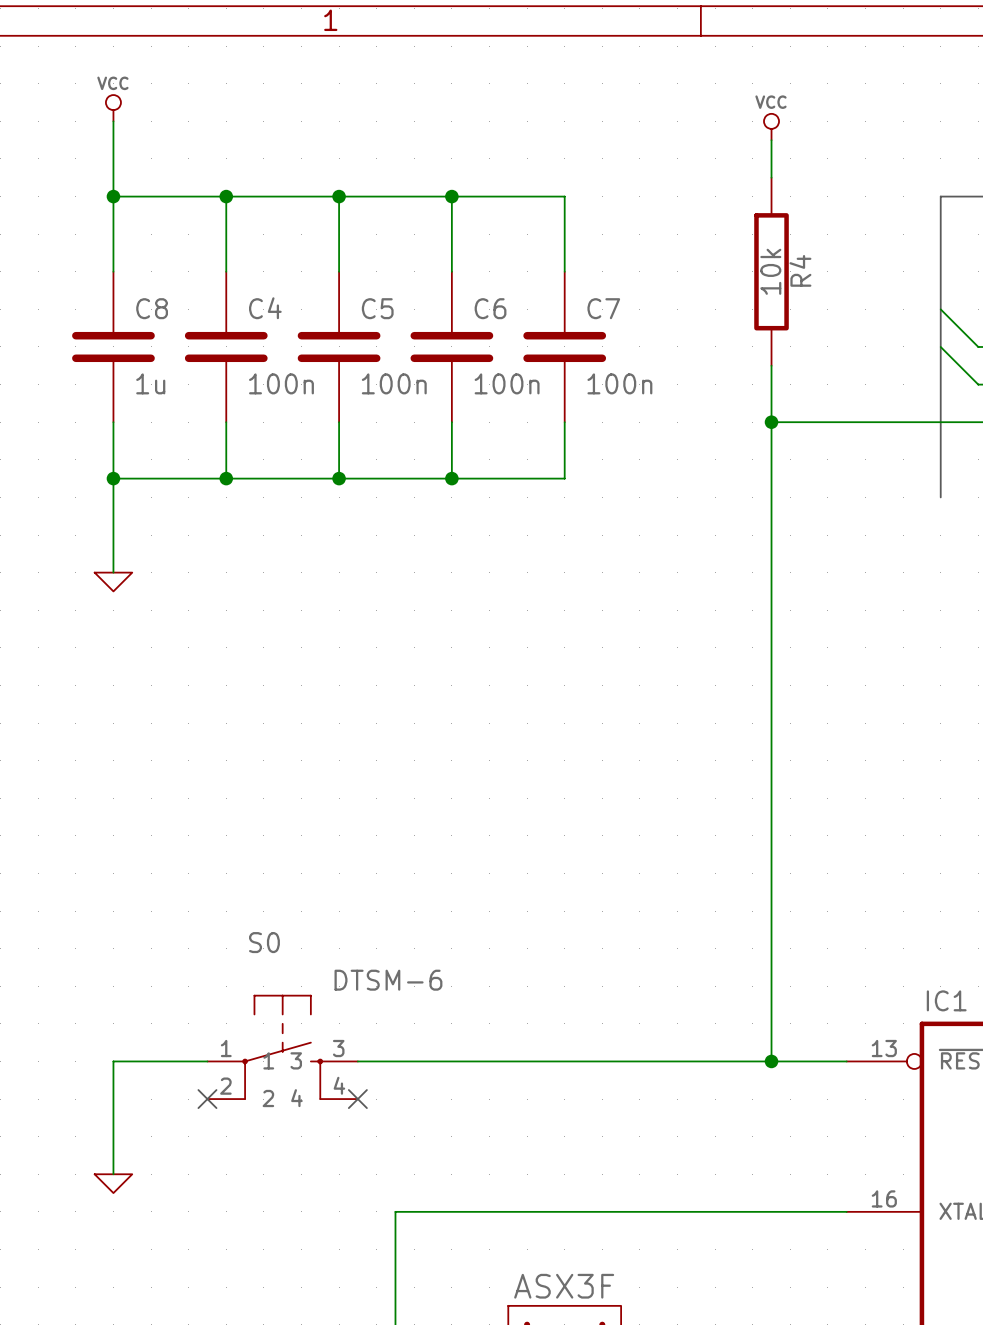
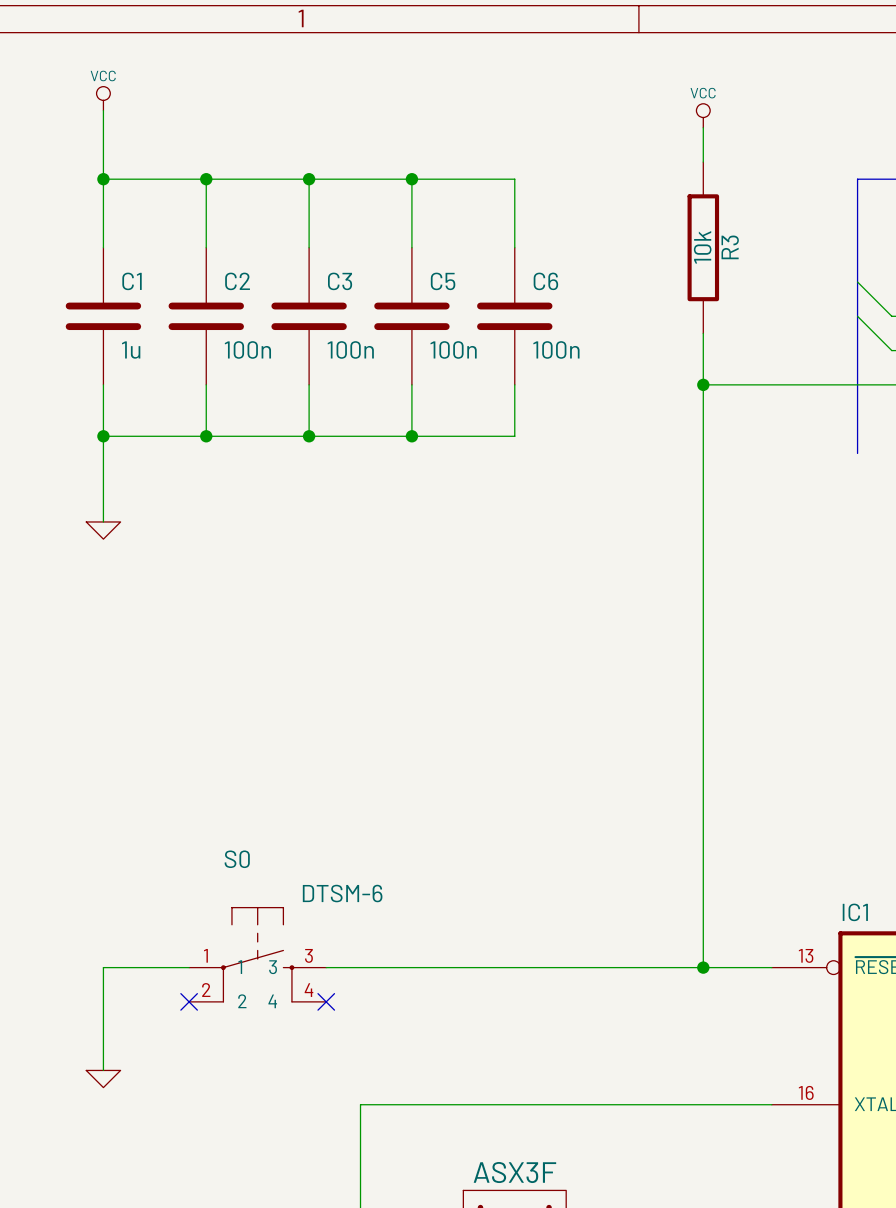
R4 name: R4 (800, 270) -> R3 (730, 247)
C8 name: C8 (152, 308) -> C1 (132, 281)
C4 name: C4 (265, 308) -> C2 (237, 281)
C5 name: C5 (377, 308) -> C3 (340, 281)
C6 name: C6 (490, 308) -> C5 (443, 281)
C7 name: C7 (603, 308) -> C6 (545, 281)

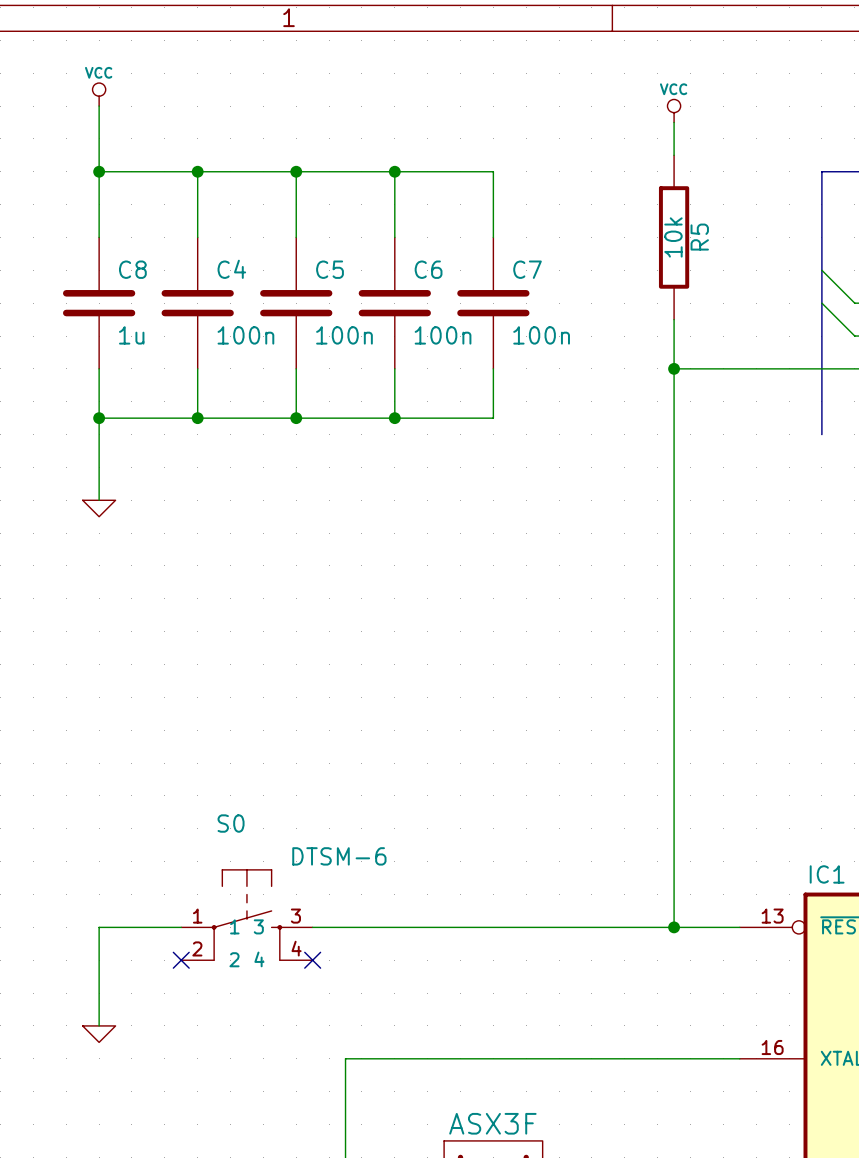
R3 name: R3 (730, 247) -> R5 (699, 237)
C1 name: C1 (132, 281) -> C8 (132, 269)
C2 name: C2 (237, 281) -> C4 (231, 269)
C3 name: C3 (340, 281) -> C5 (330, 269)
C5 name: C5 (443, 281) -> C6 (428, 269)
C6 name: C6 (545, 281) -> C7 (527, 269)

